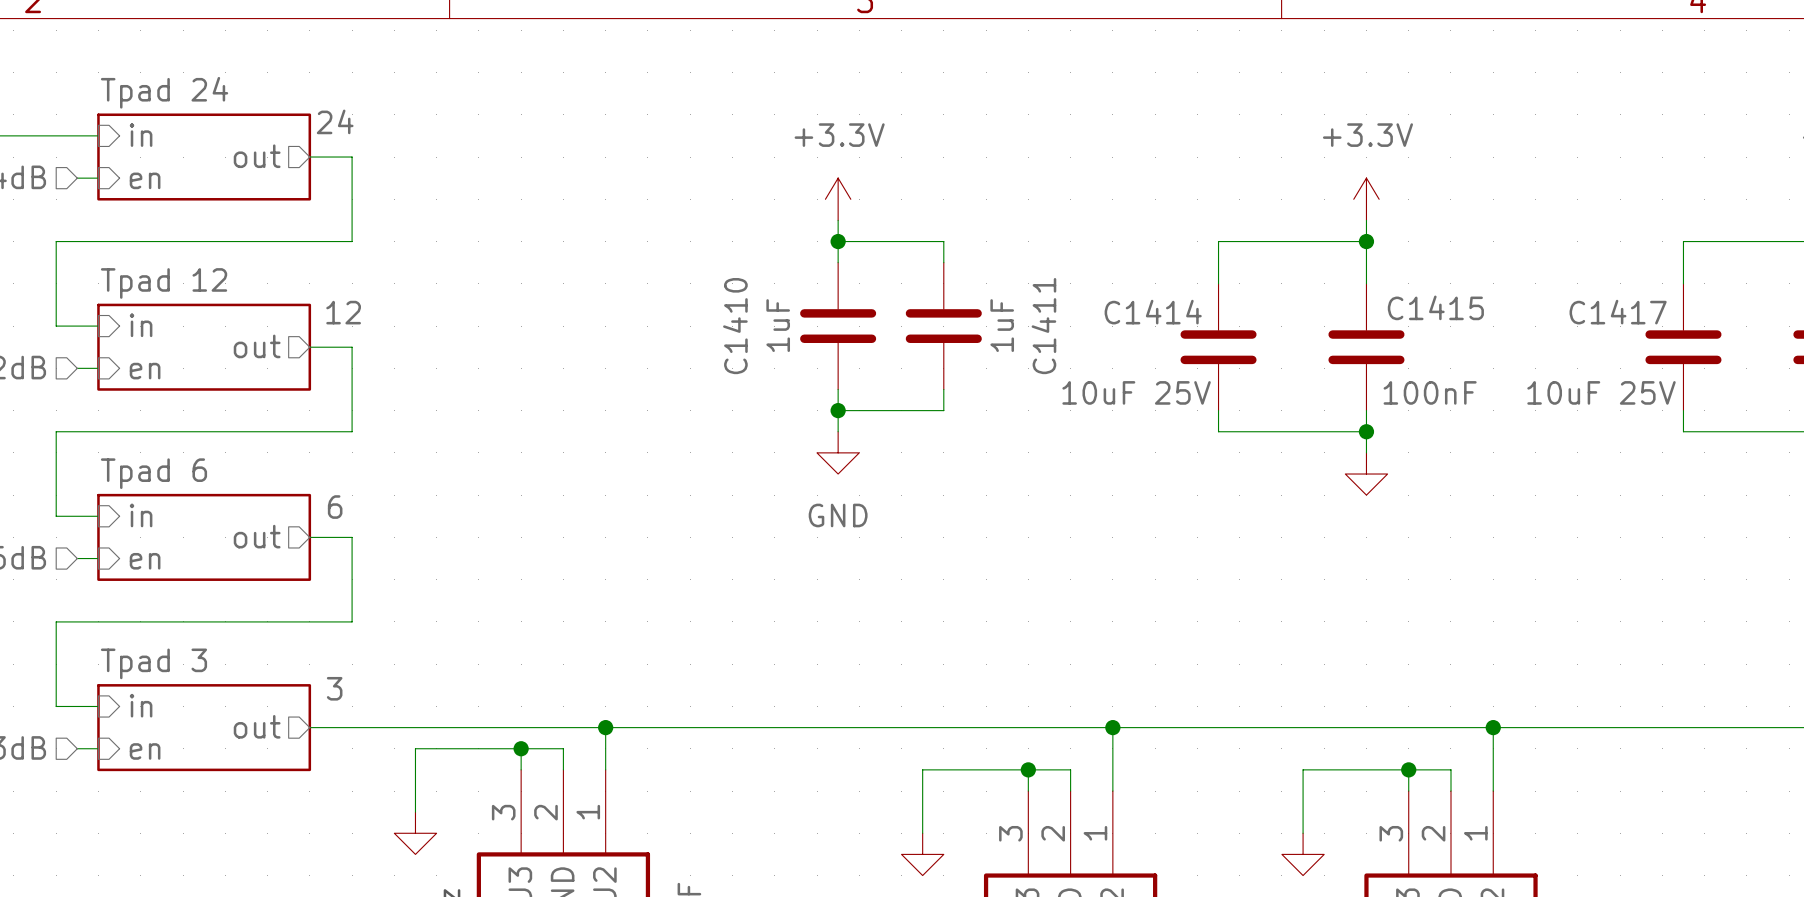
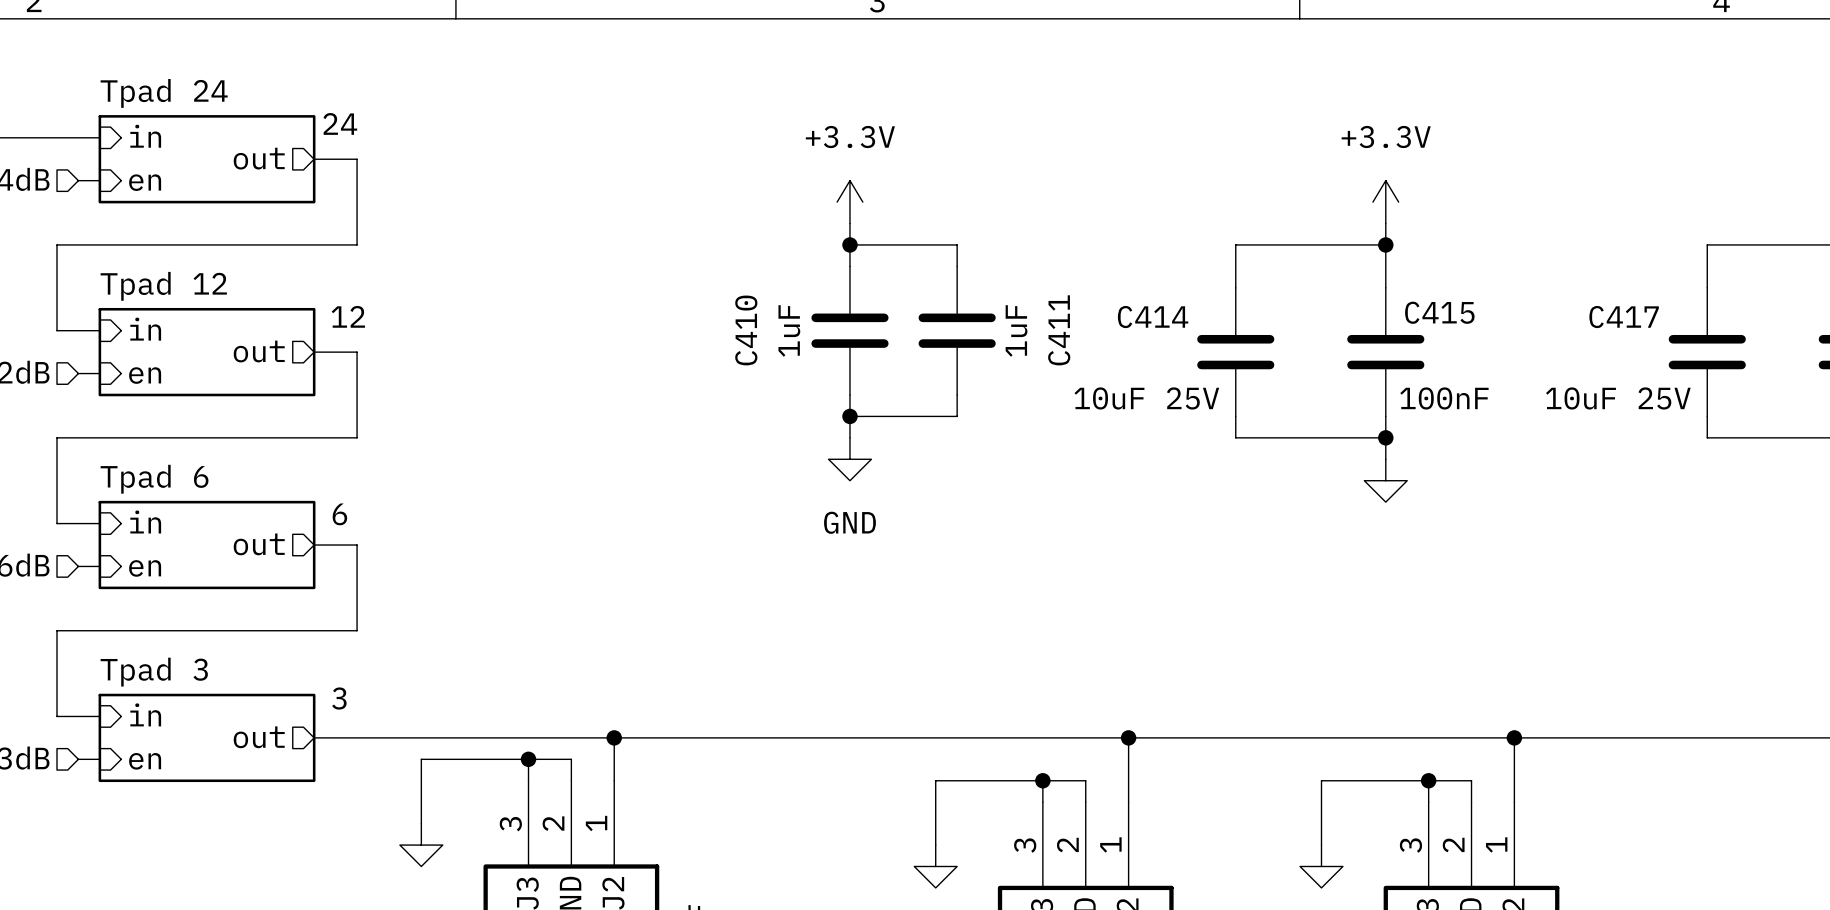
C1415 name: C1415 (1435, 307) -> C415 (1439, 312)
C1414 name: C1414 (1153, 312) -> C414 (1153, 317)
C1417 name: C1417 (1618, 312) -> C417 (1624, 317)
C1410 name: C1410 (735, 326) -> C410 (746, 330)
C1411 name: C1411 (1043, 326) -> C411 (1059, 330)

